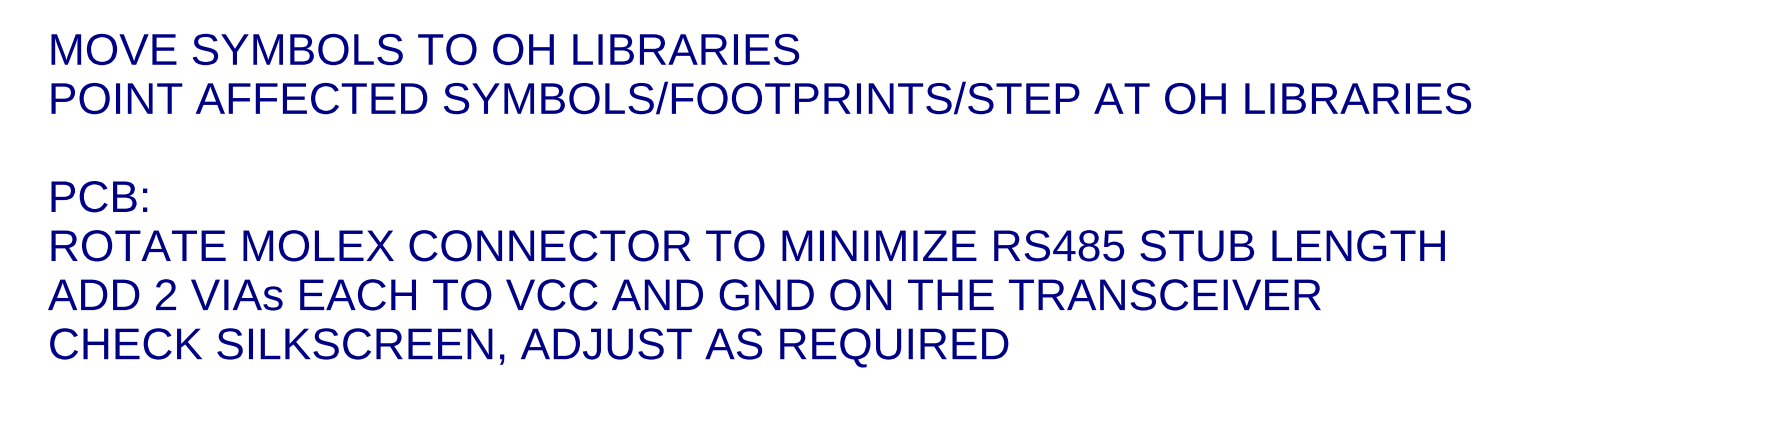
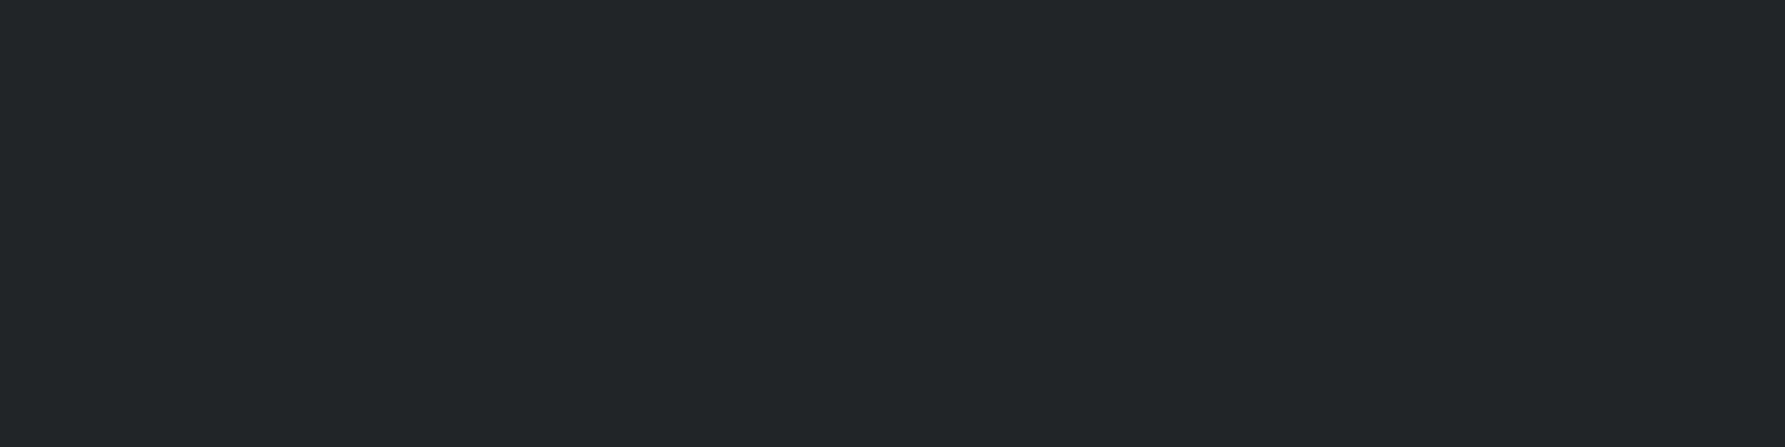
text: MOVE SYMBOLS TO OH LIBRARIES (425, 49) -> none
text: POINT AFFECTED SYMBOLS/FOOTPRINTS/STEP AT OH LIBRARIES (761, 97) -> none
text: PCB: (99, 196) -> none
text: ROTATE MOLEX CONNECTOR TO MINIMIZE RS485 STUB LENGTH (748, 245) -> none
text: ADD 2 VIAs EACH TO VCC AND GND ON THE TRANSCEIVER (684, 294) -> none
text: CHECK SILKSCREEN, ADJUST AS REQUIRED (529, 347) -> none

